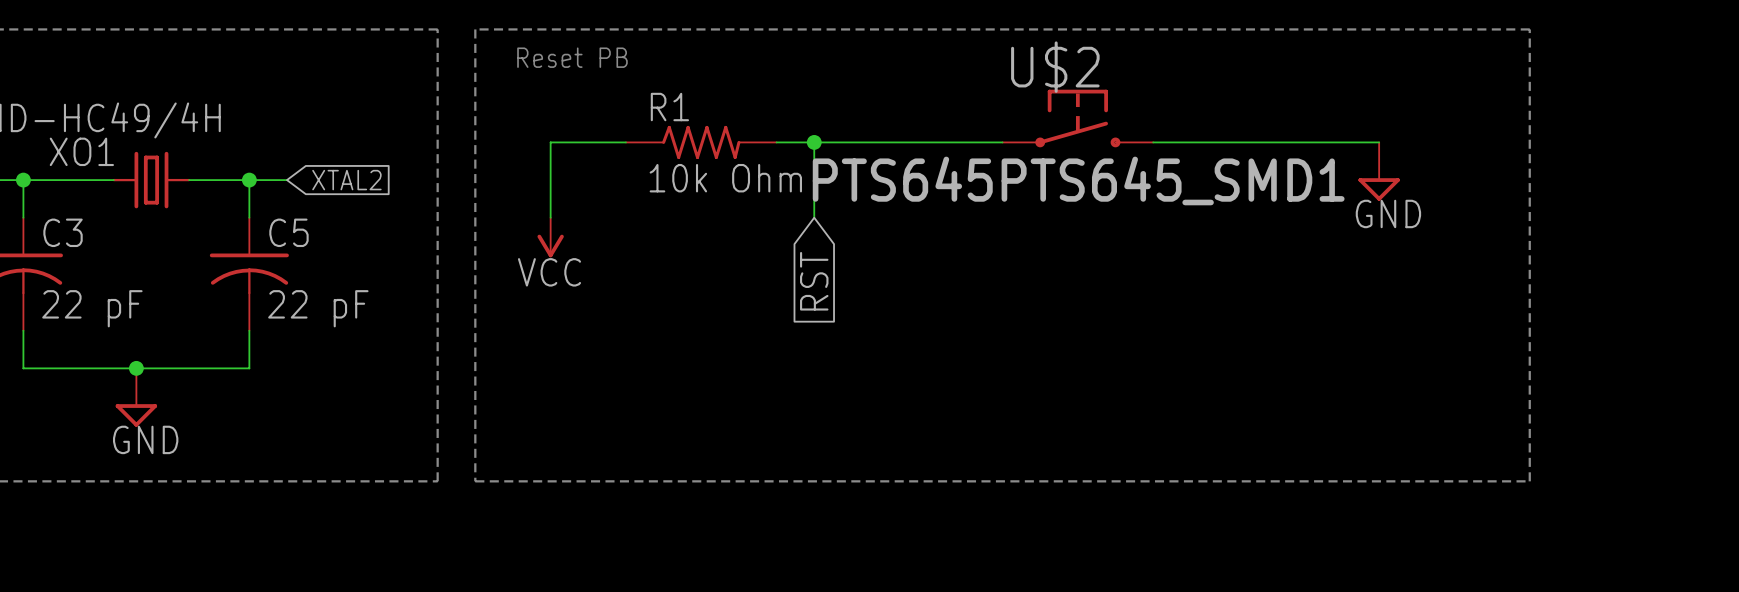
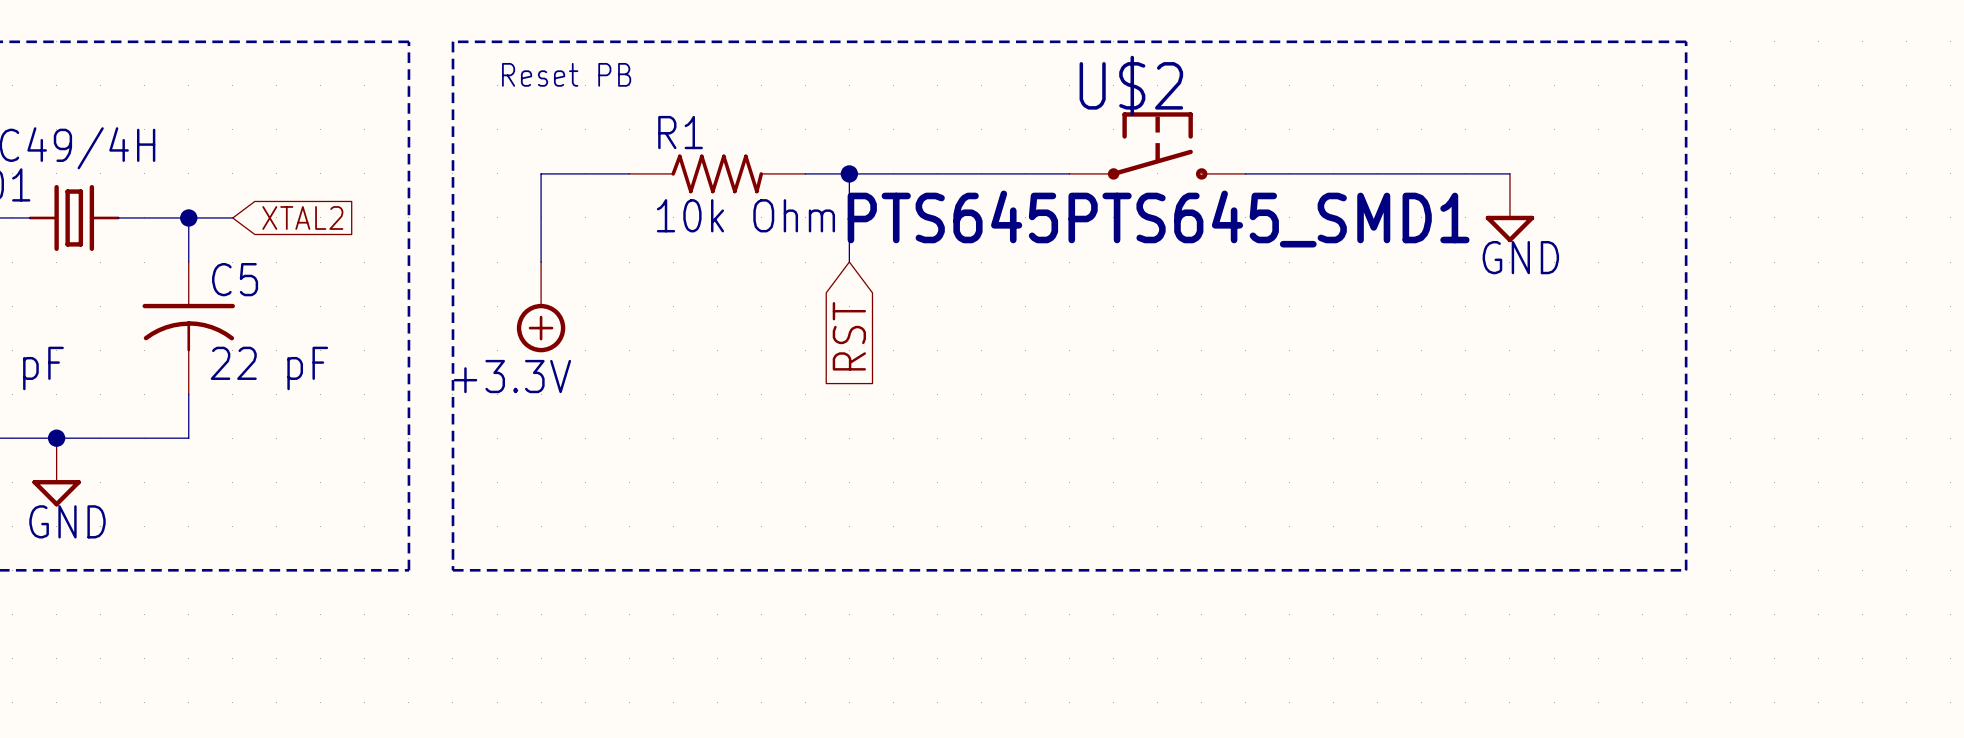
power symbol: VCC (550, 237) -> none
power symbol: none -> +3.3V (541, 307)

